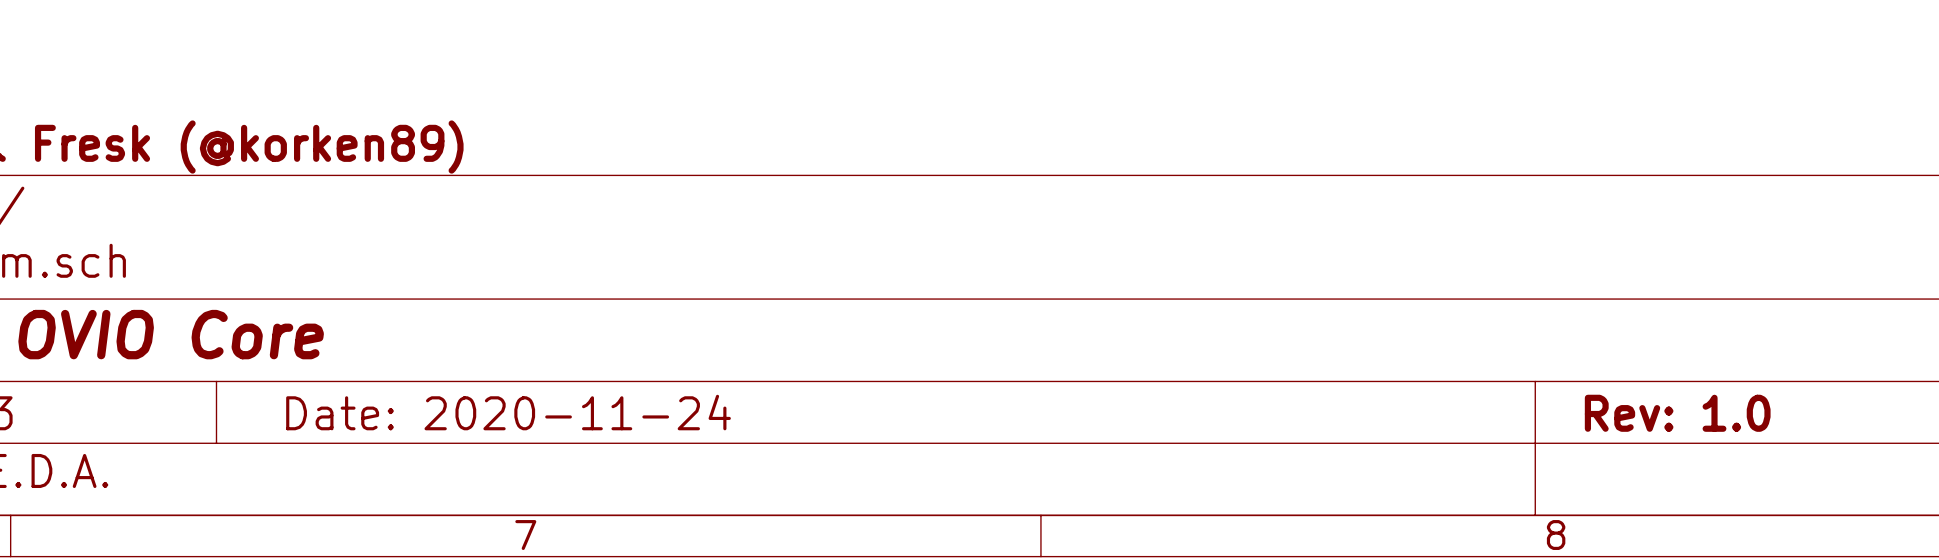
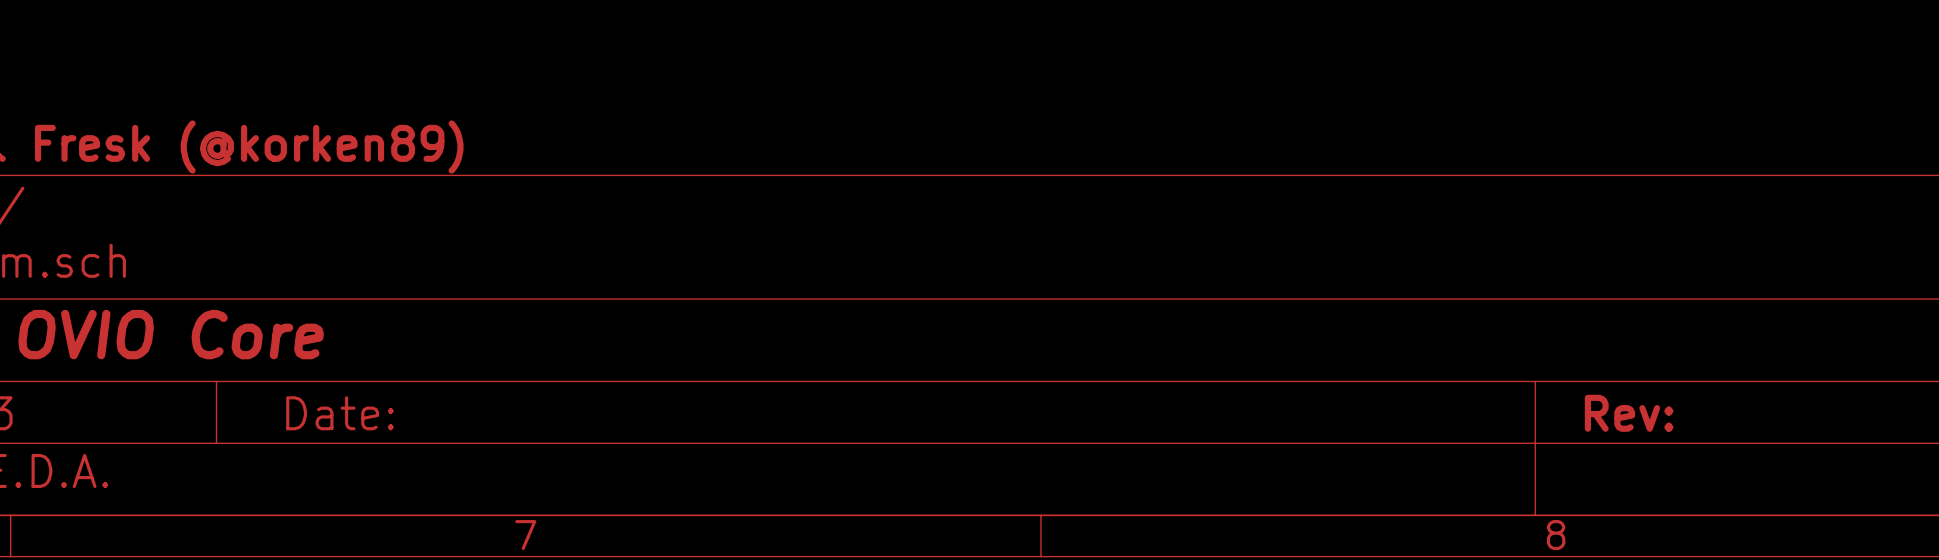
title block: Date: 2020-11-24 (508, 412) -> Date: (339, 413)
title block: Rev: 1.0 (1677, 413) -> Rev: (1629, 413)

